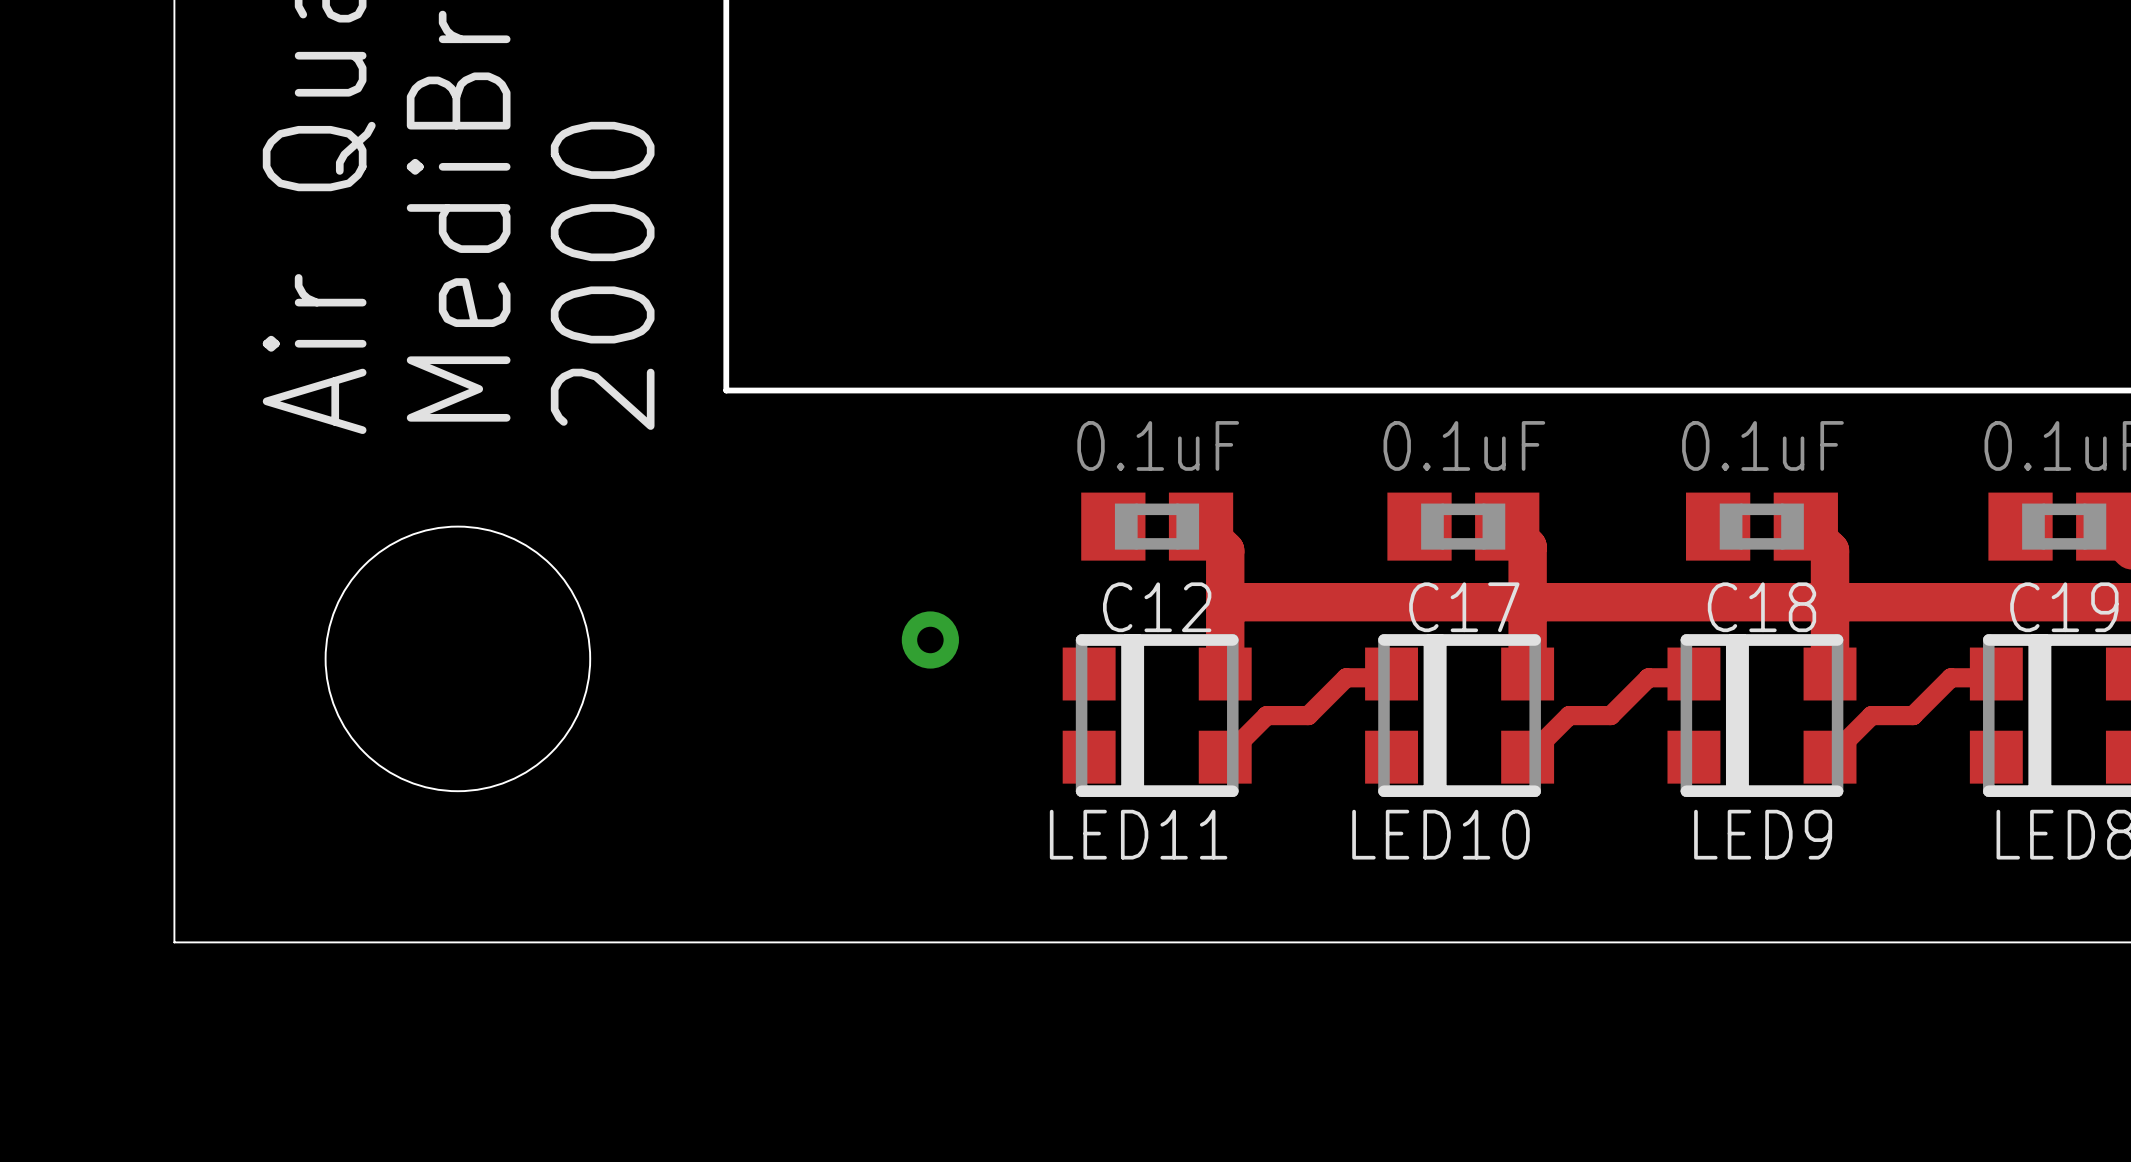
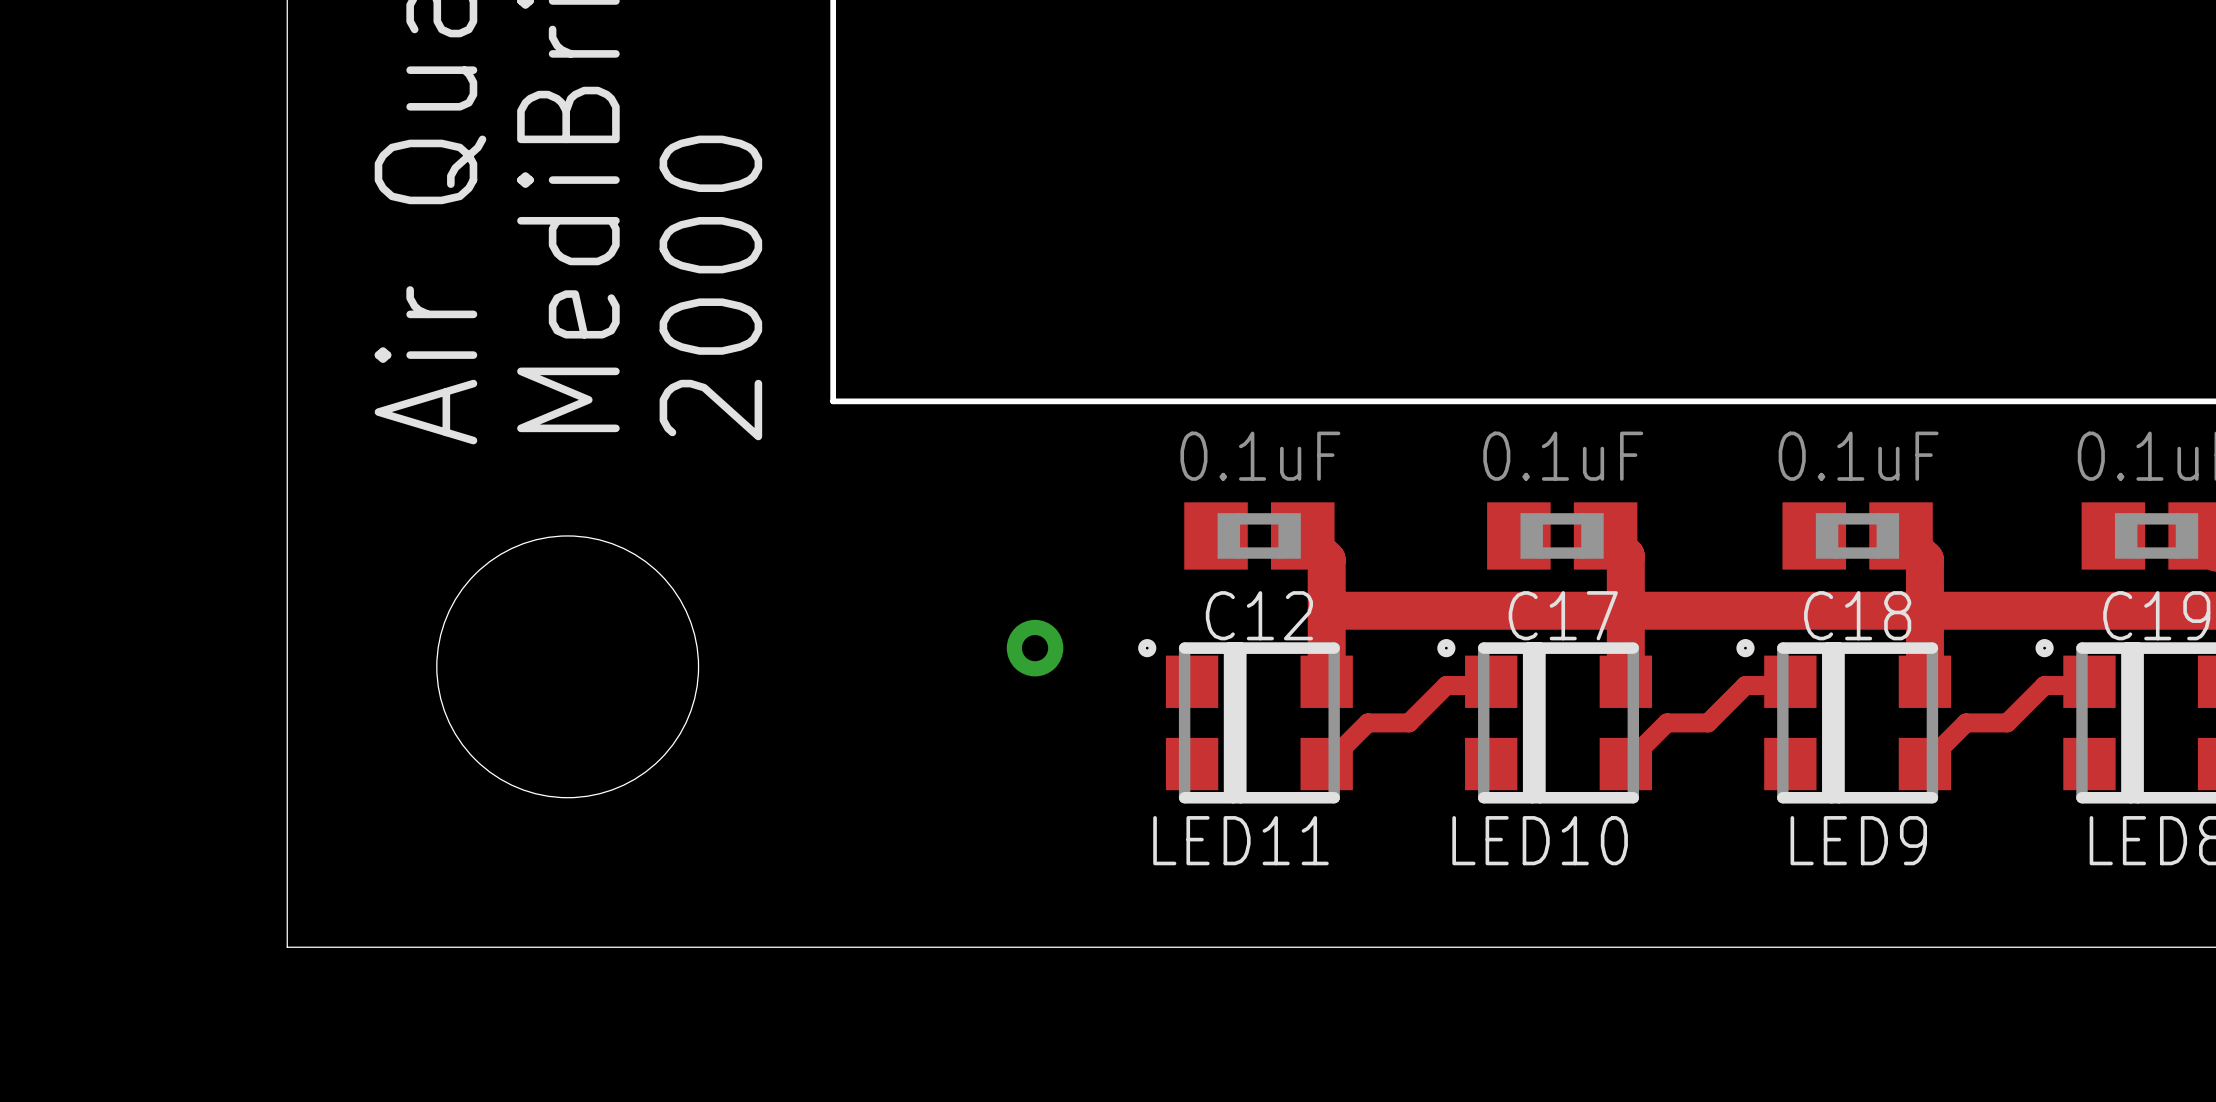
drawing: none -> [1138, 639, 1157, 658]
drawing: none -> [1437, 639, 1456, 658]
drawing: none -> [1736, 639, 1755, 658]
drawing: none -> [2035, 639, 2054, 658]

